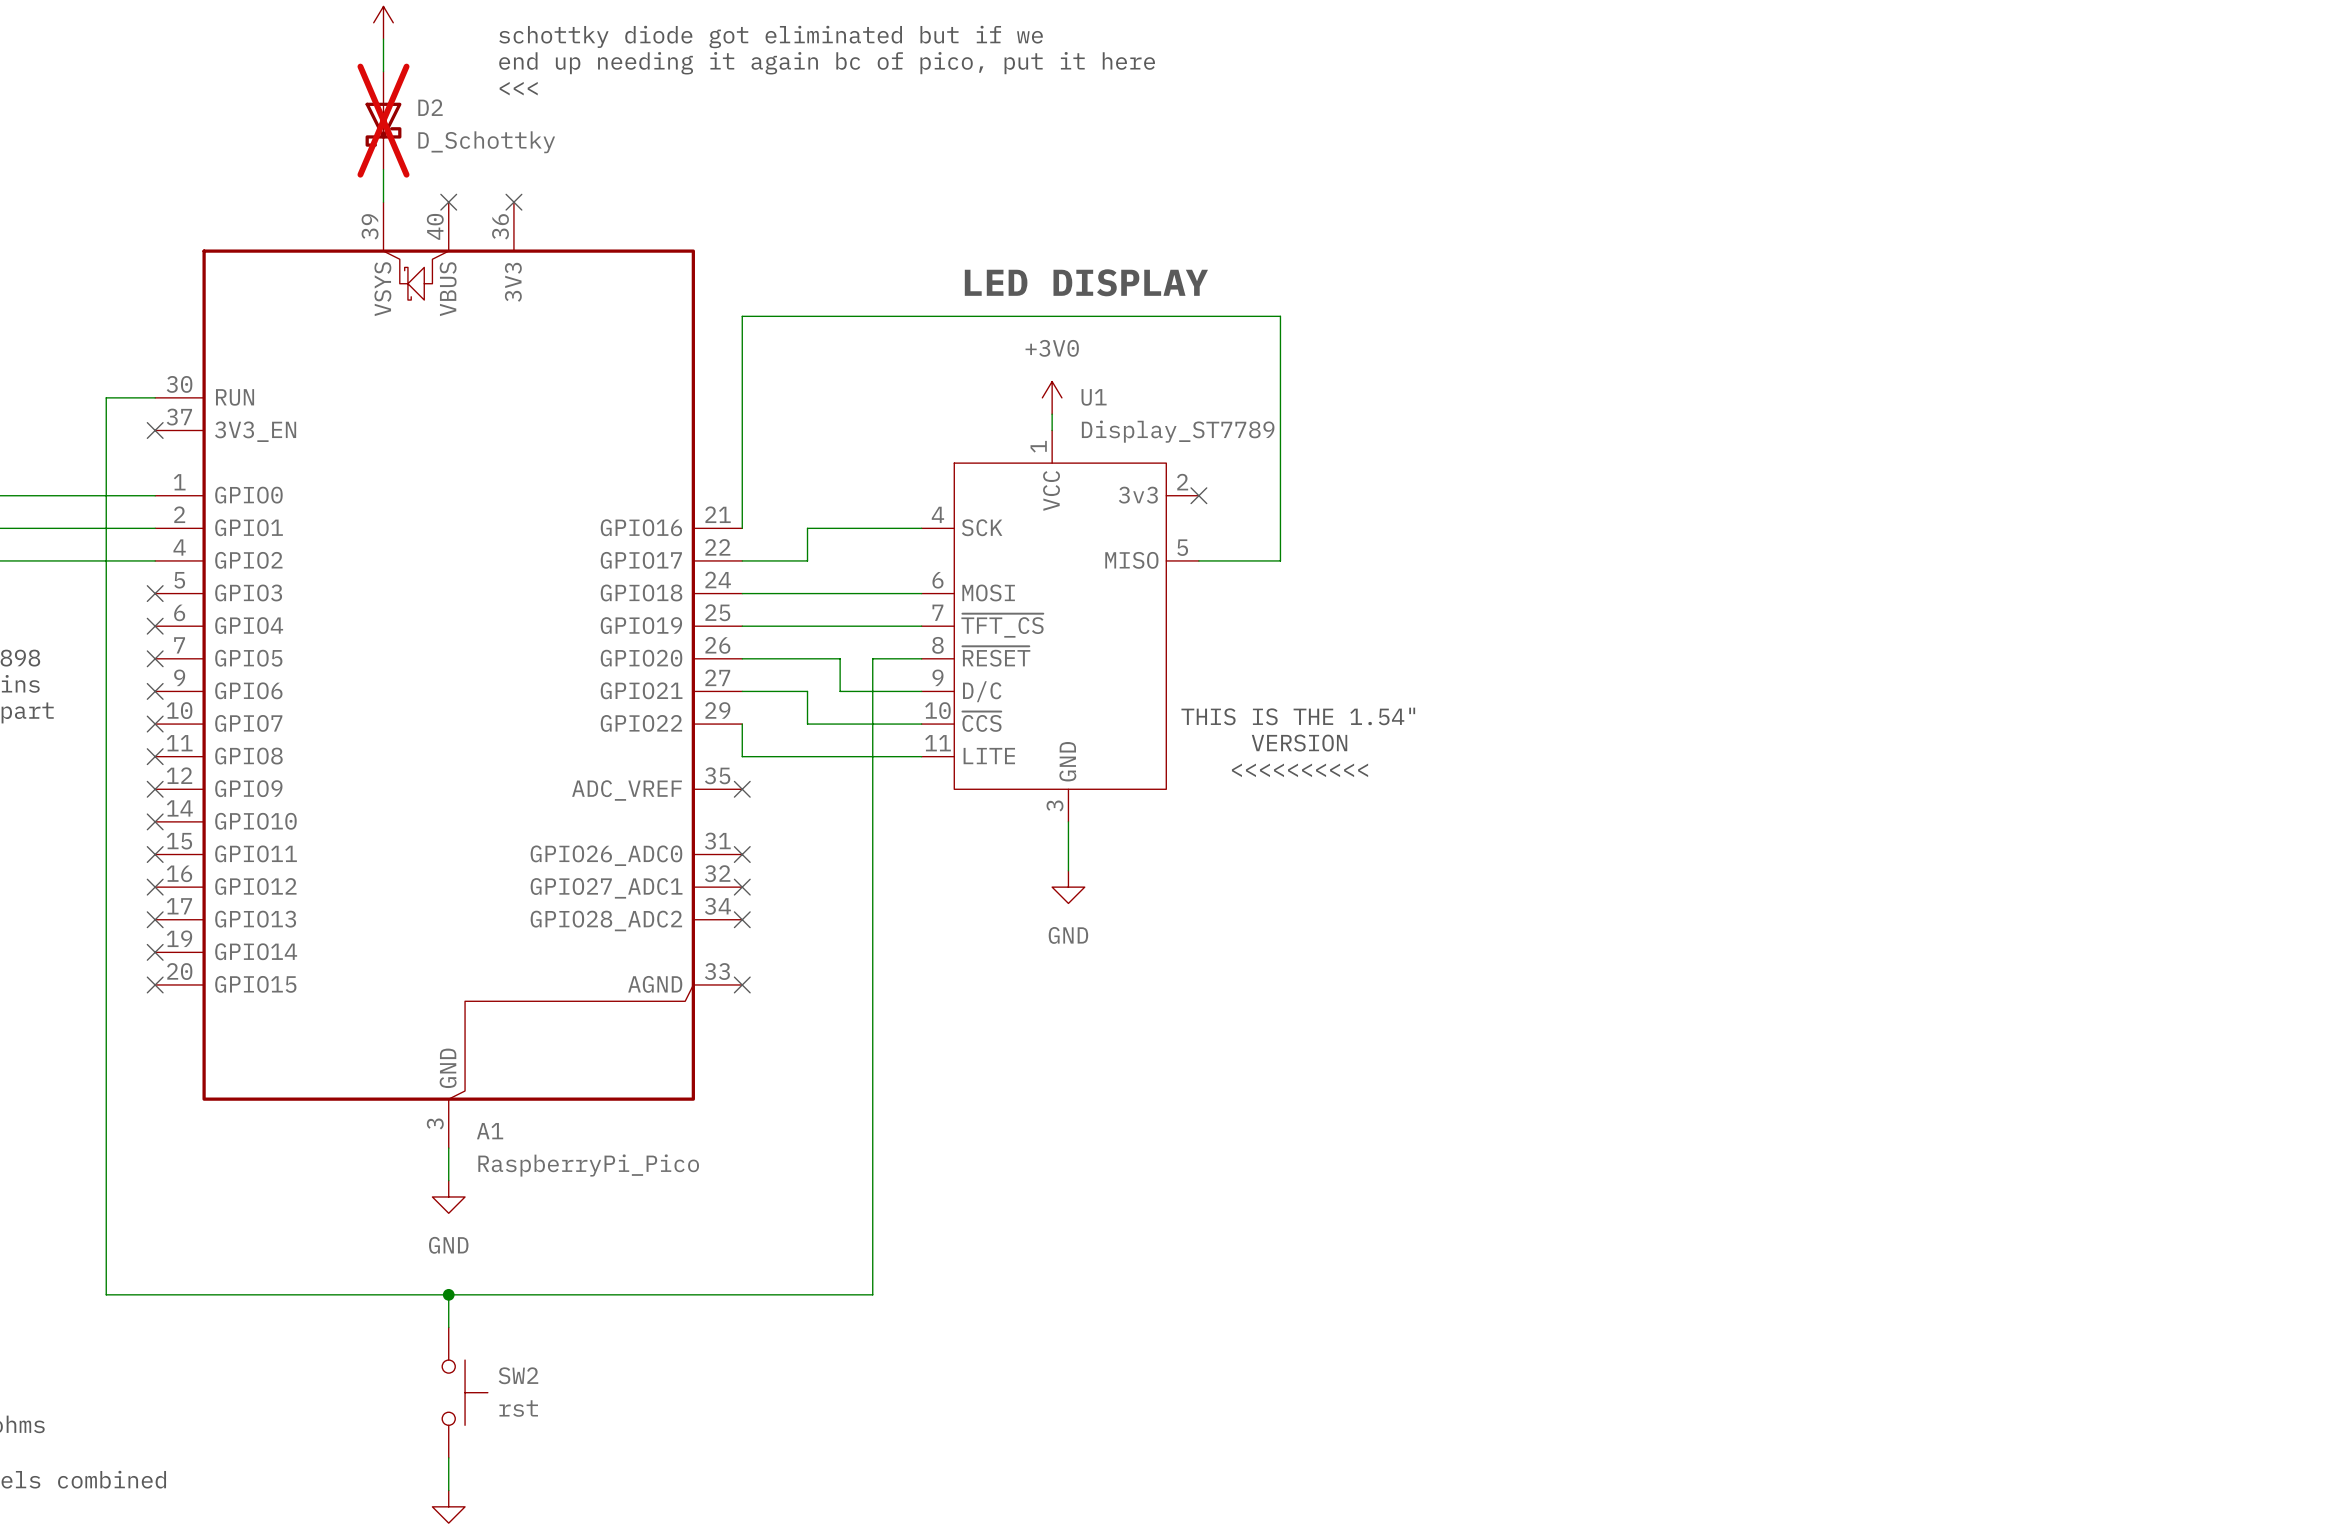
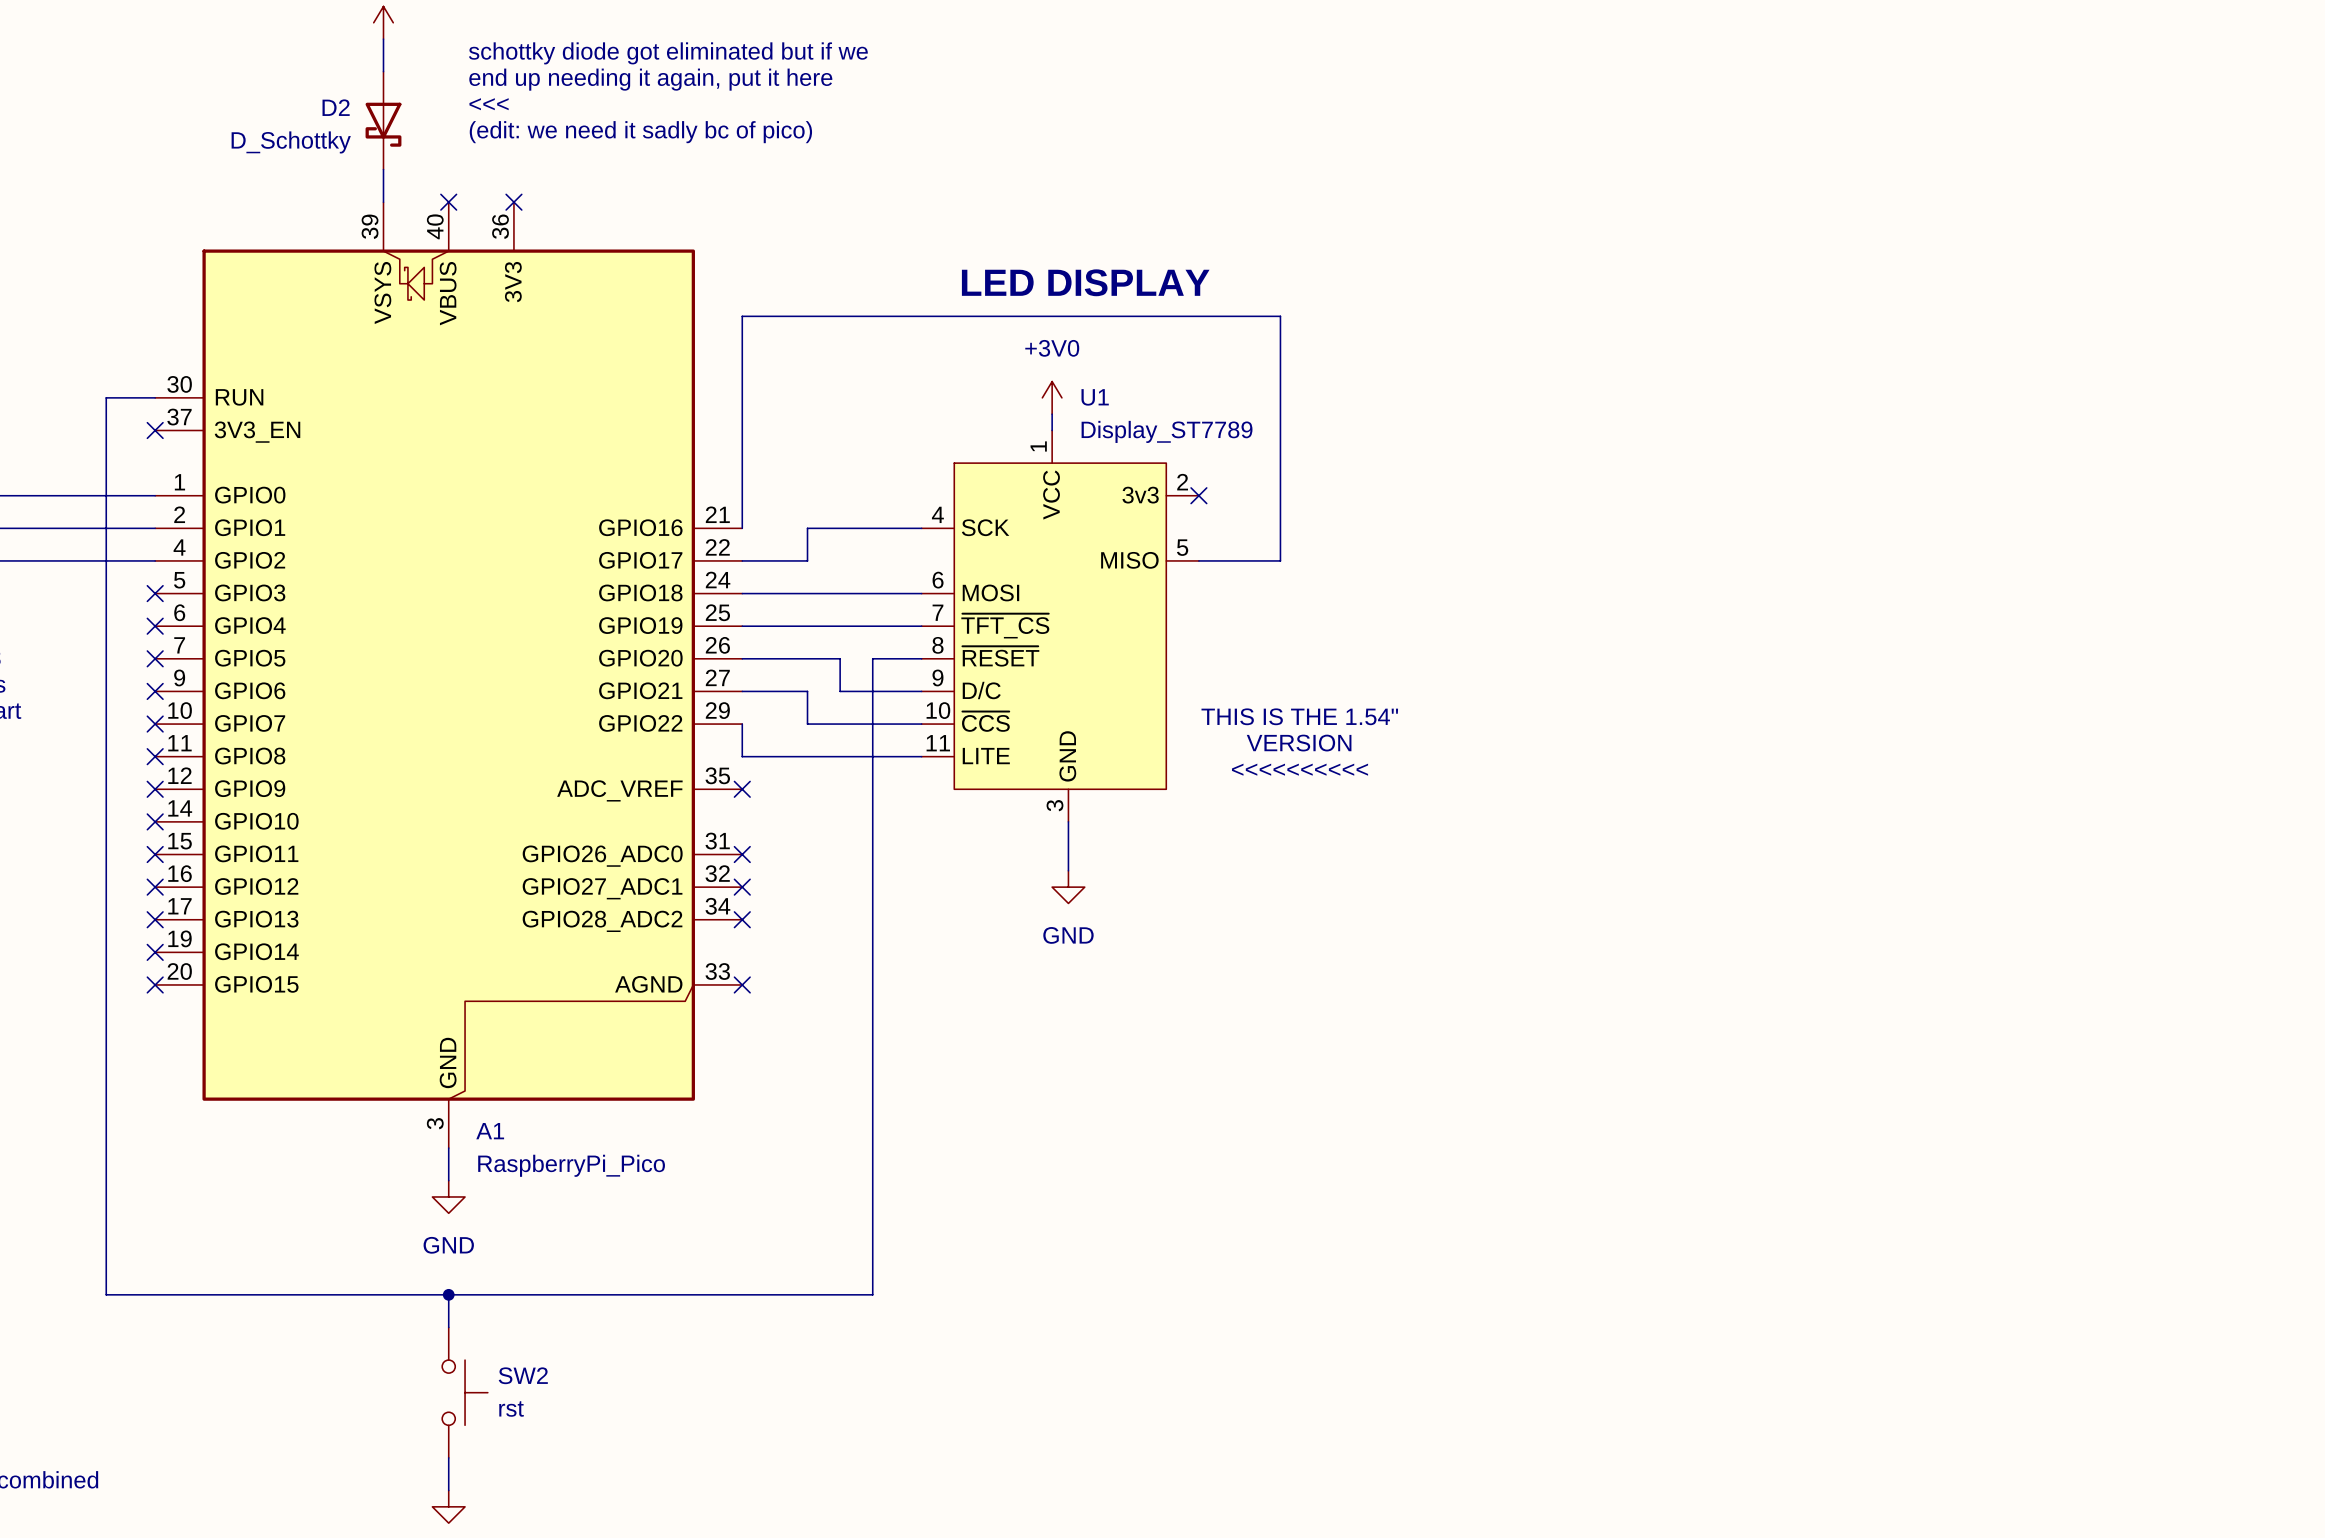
text position: schottky diode got eliminated but if we (771, 37) -> schottky diode got eliminated but if we (668, 53)
text: end up needing it again bc of pico, put it here (827, 63) -> end up needing it again, put it here (650, 79)
text position: <<< (518, 88) -> <<< (489, 104)
D2 do-not-place cross: (383, 120) -> none
D2 flip: as is (383, 124) -> left-right (383, 124)
text: none -> (edit: we need it sadly bc of pico) (640, 132)

